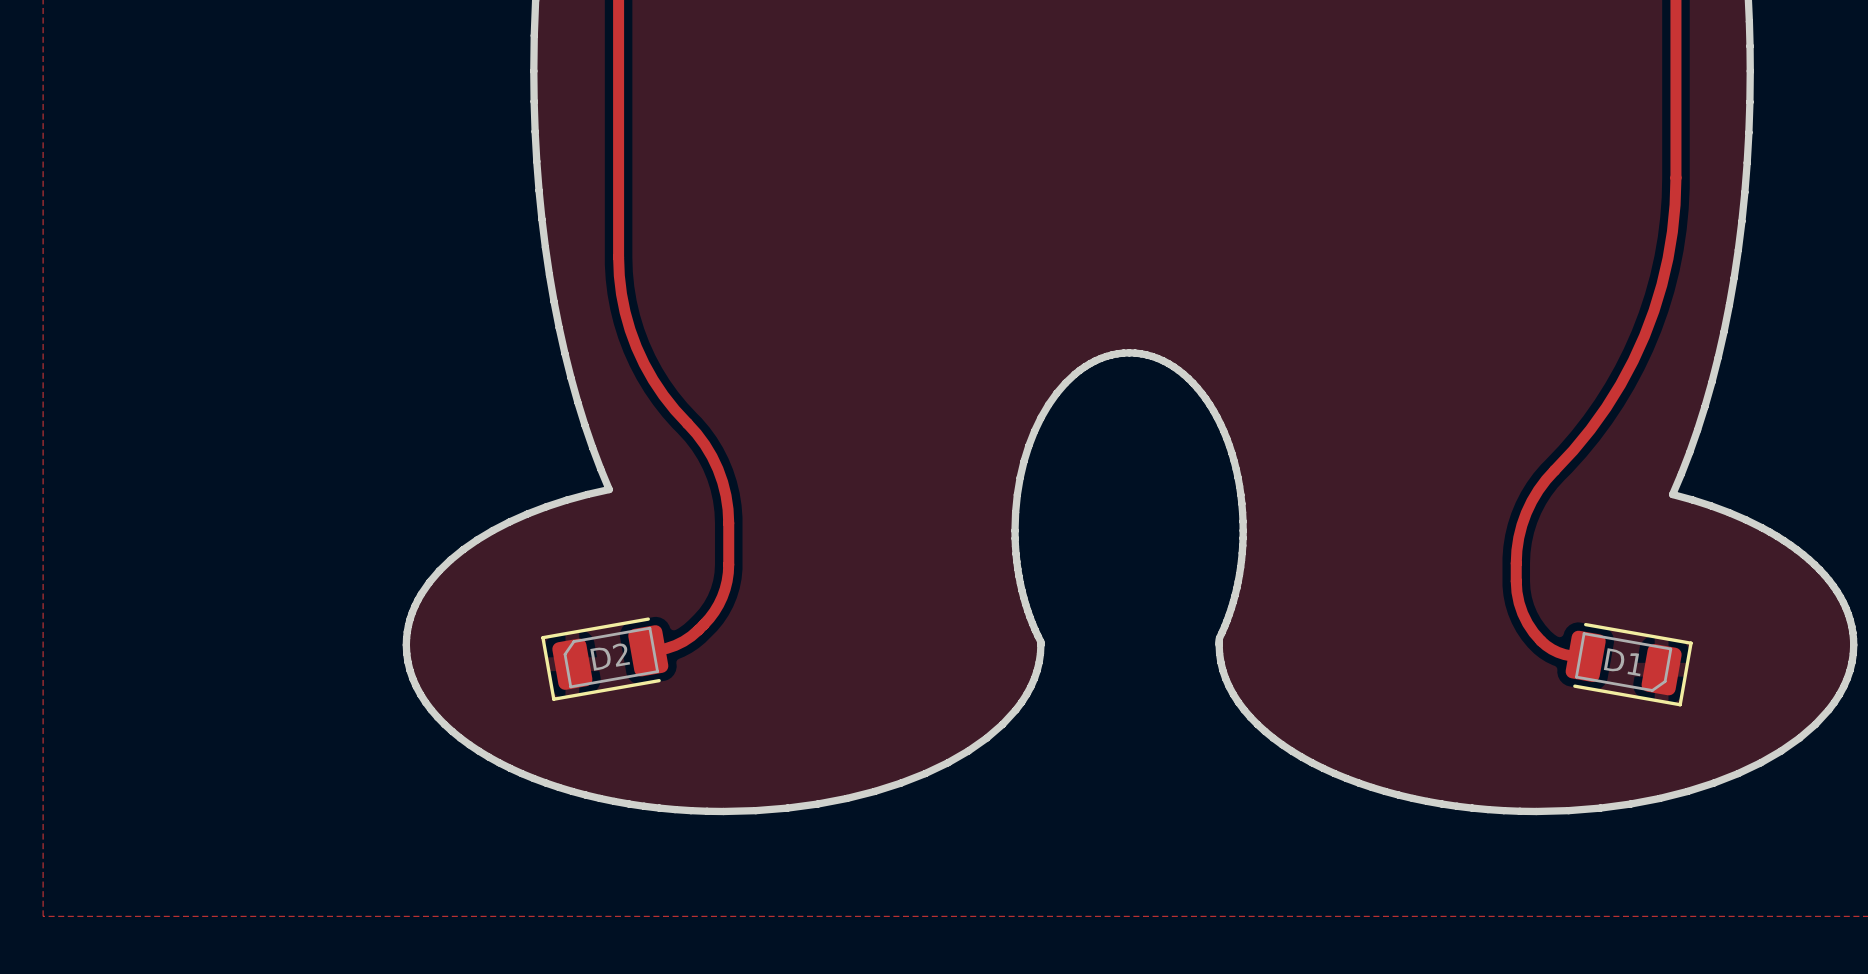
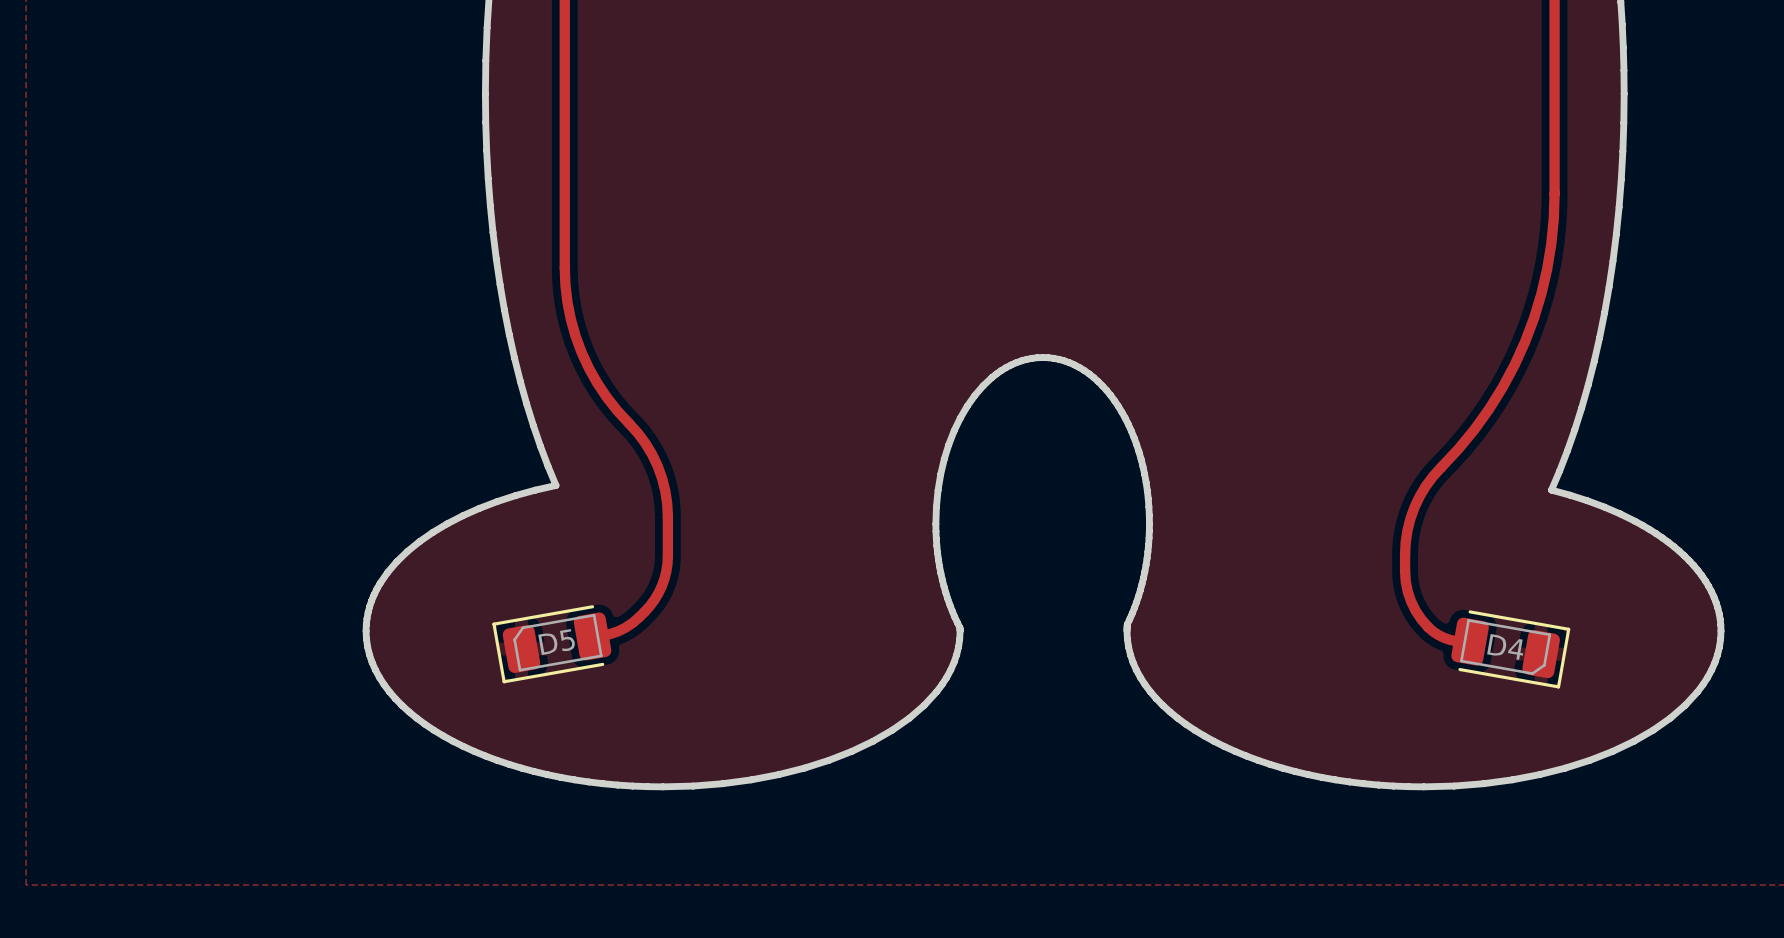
D2 name: D2 (610, 656) -> D5 (556, 642)
D1 name: D1 (1622, 662) -> D4 (1505, 646)

